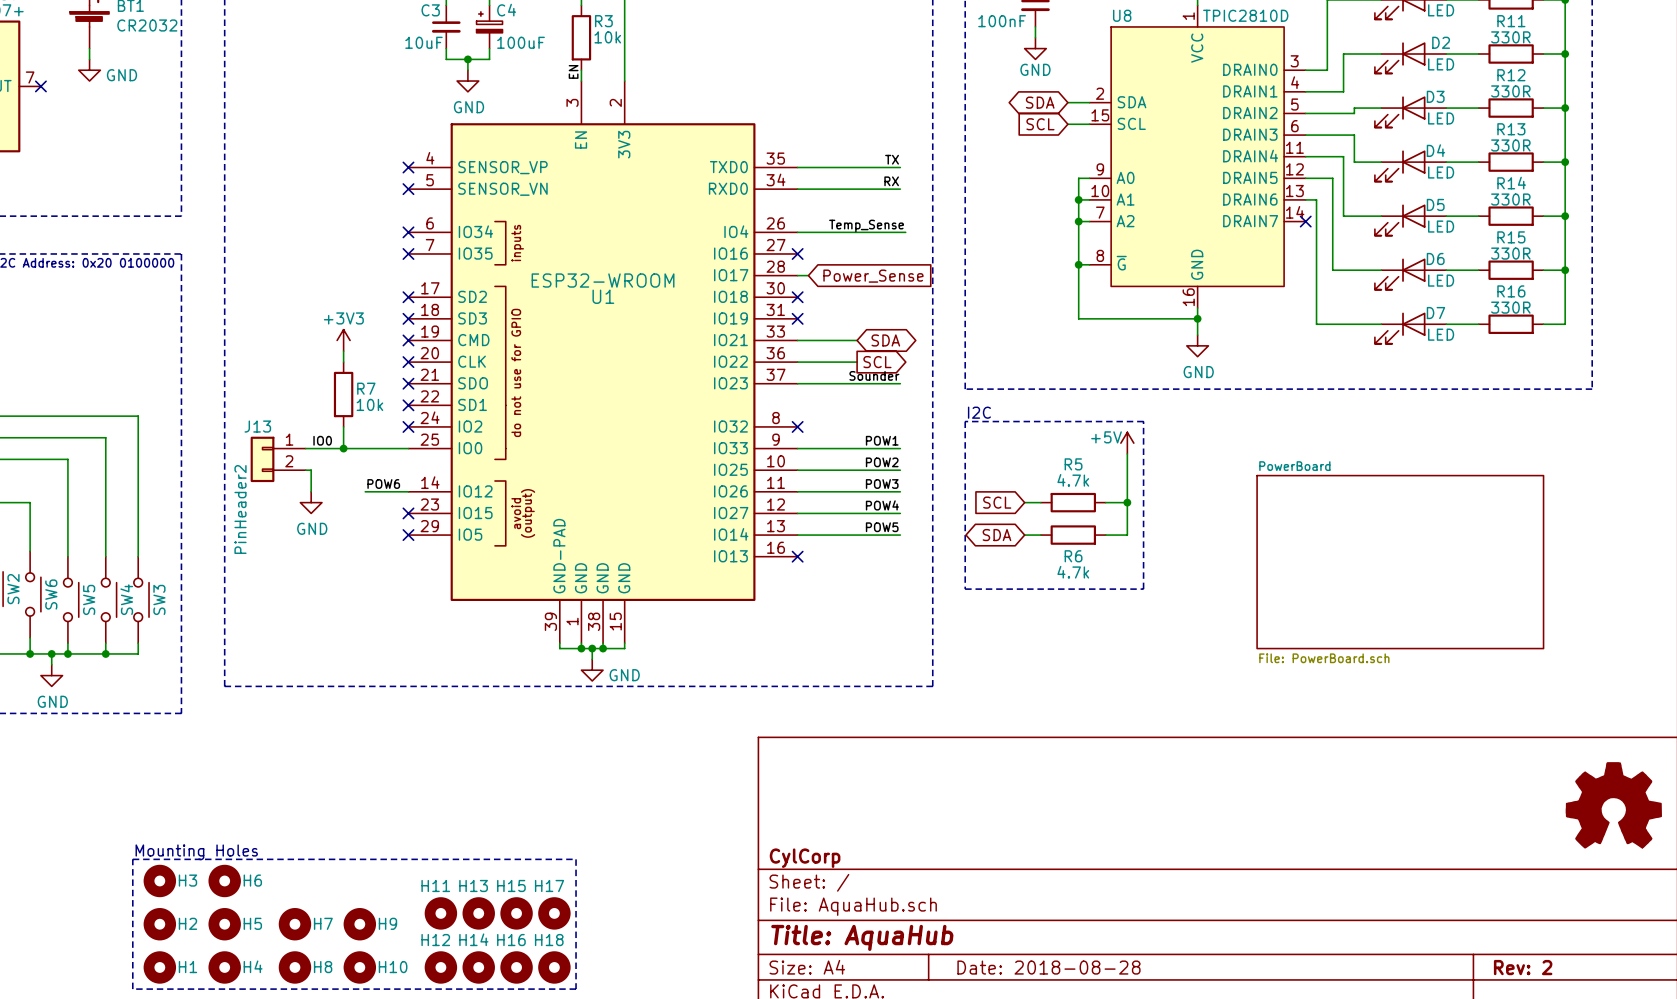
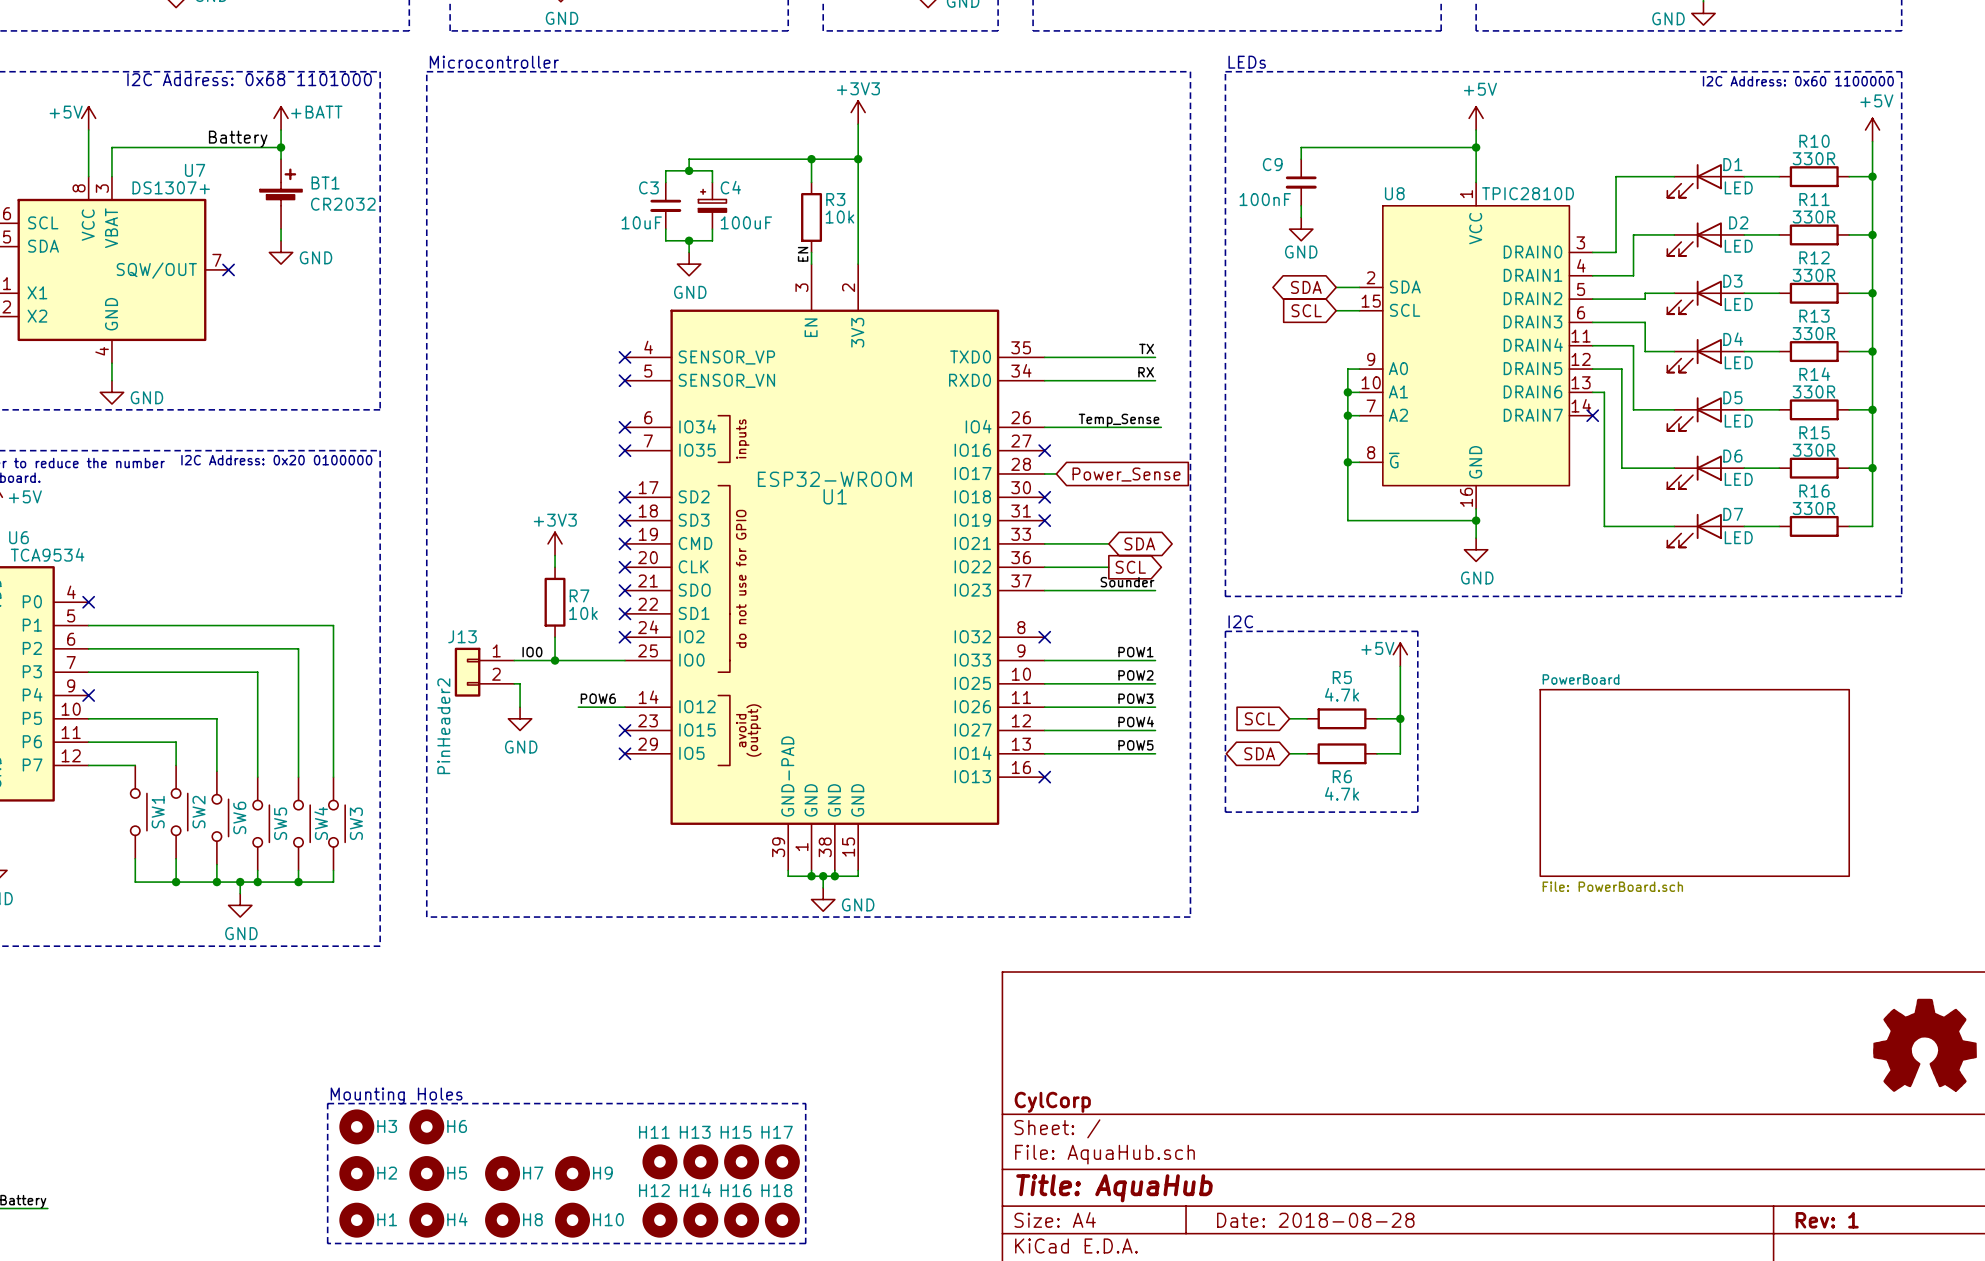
title block: Rev: 2 (1523, 967) -> Rev: 1 (1827, 1220)

